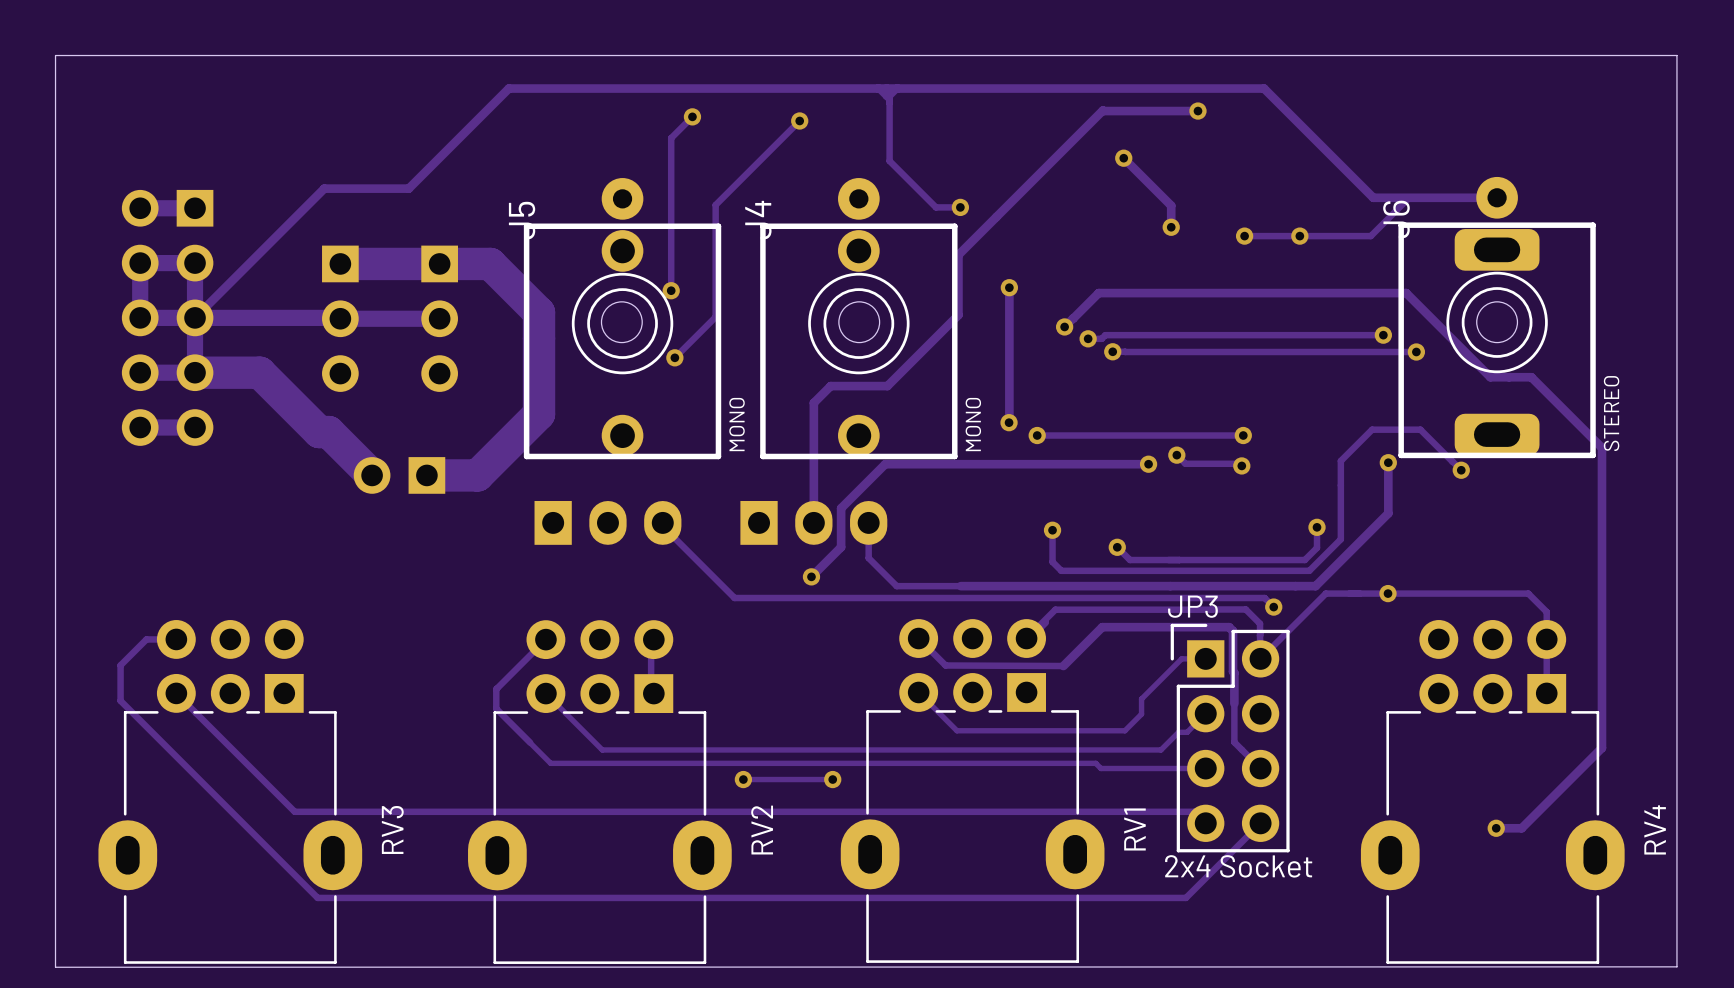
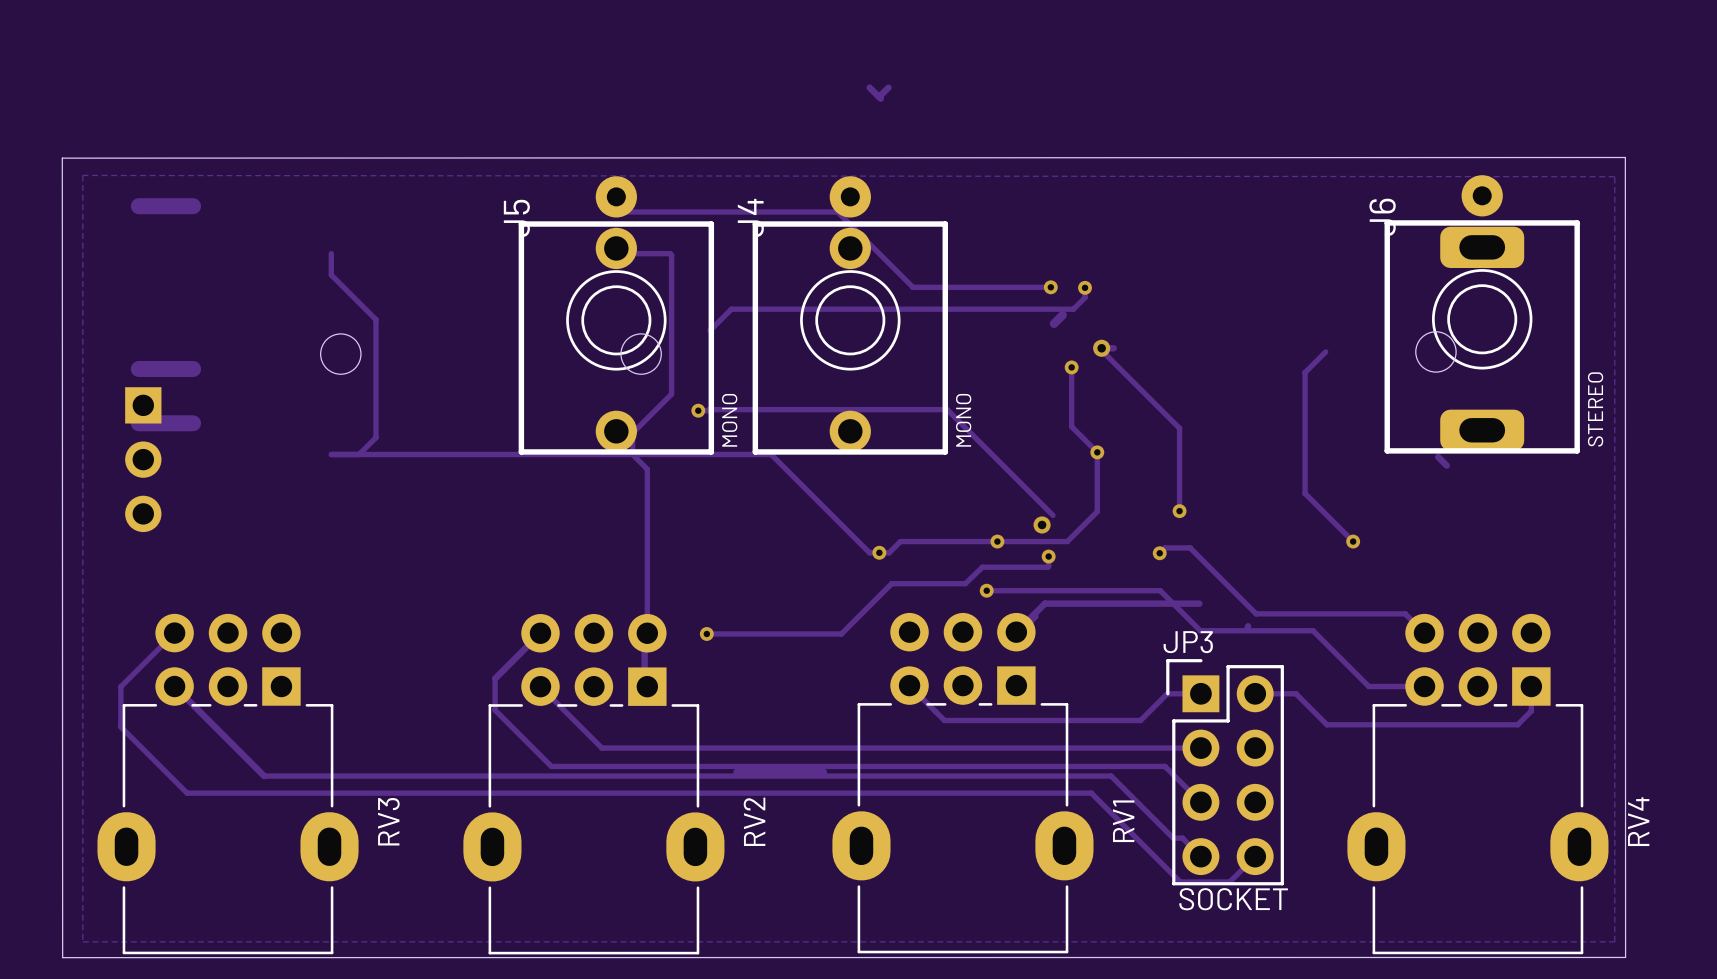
board edge: (55, 55) (1676, 55) (1676, 966) (55, 967) (55, 55) -> (1625, 157) (62, 158) (62, 957) (1625, 957) (1625, 157)
track: (886, 88) (889, 91) (889, 161) (936, 207) (960, 207) -> none
track: (1197, 111) (1102, 110) (958, 254) (958, 315) (887, 386) (830, 386) (813, 402) (813, 522) -> none
via: (1197, 111) -> none
track: (692, 116) (671, 138) (671, 290) -> none
via: (692, 116) -> none
track: (799, 120) (715, 205) (715, 317) (674, 357) -> none
via: (799, 120) -> none
track: (1123, 158) (1171, 205) (1171, 227) -> none
via: (1123, 158) -> none
zone outline: none -> (82, 175) (82, 941) (1614, 941) (1614, 176) (82, 175)
via: (960, 207) -> none
track: none -> (606, 211) (837, 211) (913, 287) (1050, 287)
via: (1171, 227) -> none
track: (1244, 236) (1370, 236) (1409, 197) (1497, 197) (1373, 197) (1264, 88) (508, 88) (408, 188) (324, 188) (195, 317) -> none
via: (1244, 236) -> none
via: (1299, 236) -> none
track: none -> (331, 253) (331, 275) (375, 319) (375, 437) (359, 454)
track: none -> (632, 253) (669, 253) (671, 255) (671, 394) (632, 433) (632, 454) (647, 469) (647, 633)
track: (340, 263) (490, 263) (539, 312) (539, 414) (477, 475) (426, 475) -> none
track: (1009, 287) (1009, 422) -> none
via: (1009, 287) -> none
via: (671, 290) -> none
via: none -> (1050, 287)
track: none -> (1085, 287) (1085, 297) (1073, 309) (731, 309) (710, 330)
via: none -> (1085, 287)
round board edge: [838, 301, 881, 344] -> none
part: (167, 317) -> none
part: (340, 318) -> none
track: (439, 318) (339, 317) (140, 317) (140, 263) (195, 263) (195, 372) (259, 372) (319, 432) (328, 432) (372, 475) -> none
part: (439, 318) -> none
track: (1073, 318) (1098, 293) (1406, 293) (1490, 377) (1531, 377) (1601, 447) (1601, 748) (1521, 828) (1496, 828) -> none
round board edge position: (621, 322) -> (641, 354)
round board edge position: (1497, 322) -> (1435, 351)
via: (1064, 326) -> none
track: (1383, 335) (1105, 335) (1101, 338) (1088, 338) -> none
via: (1383, 335) -> none
round board edge: none -> [320, 333, 362, 375]
via: (1088, 338) -> none
track: none -> (1096, 345) (1179, 428) (1179, 511)
track: (1125, 351) (1416, 351) -> none
via: (1416, 351) -> none
track: none -> (1325, 351) (1305, 372) (1305, 493) (1353, 541)
via: (674, 357) -> none
track: none -> (1071, 367) (1071, 426) (1097, 452) (1097, 511) (1067, 541) (900, 541) (889, 552) (869, 552) (771, 454) (331, 454)
via: none -> (1071, 367)
track: none -> (698, 410) (947, 409) (1052, 515)
via: none -> (698, 410)
via: (1009, 422) -> none
track: (1037, 435) (1243, 435) -> none
via: (1037, 435) -> none
via: (1243, 435) -> none
track: (1176, 455) (1185, 463) (1239, 463) (1241, 465) -> none
via: (1176, 455) -> none
via: none -> (1097, 452)
track: (1452, 461) (1420, 429) (1372, 429) (1340, 460) (1340, 539) (1309, 570) (1061, 570) (1052, 561) (1052, 530) -> none
track: (1388, 462) (1388, 513) (1315, 586) (896, 586) (868, 558) (868, 522) -> none
via: (1388, 462) -> none
part: none -> (143, 459)
track: (1148, 464) (885, 464) (841, 508) (841, 547) (811, 576) -> none
via: (1148, 464) -> none
via: (1241, 465) -> none
via: (1461, 470) -> none
part: (399, 475) -> none
via: none -> (1179, 511)
part: (607, 522) -> none
track: (662, 522) (662, 526) (734, 598) (1264, 598) (1273, 607) -> none
part: (813, 522) -> none
track: (1317, 527) (1317, 547) (1304, 560) (1130, 560) (1117, 547) -> none
via: (1317, 527) -> none
via: none -> (997, 541)
via: (1117, 547) -> none
via: none -> (1353, 541)
via: none -> (879, 552)
track: none -> (1159, 553) (1165, 547) (1190, 547) (1256, 613) (1405, 613) (1424, 633)
via: none -> (1159, 553)
track: none -> (1048, 556) (1047, 567) (982, 567) (965, 583) (891, 583) (841, 633) (706, 633)
via: none -> (1048, 556)
via: (811, 576) -> none
via: (1388, 593) -> none
track: none -> (986, 590) (1160, 590) (1200, 630) (1313, 630) (1368, 686) (1424, 686)
via: none -> (986, 590)
via: (1273, 607) -> none
track: (1211, 609) (1245, 609) (1260, 623) (1260, 658) (1325, 593) (1528, 593) (1546, 611) (1546, 693) -> (1255, 693) (1296, 693) (1326, 724) (1517, 724) (1531, 711) (1531, 686)
track: (918, 638) (945, 665) (1063, 666) (1102, 627) (1229, 627) (1233, 631) (1234, 742) (1260, 768) -> none
track: (176, 639) (146, 639) (120, 665) (120, 700) (317, 897) (1185, 897) (1260, 823) -> (174, 633) (120, 686) (120, 726) (187, 793) (1091, 793) (1180, 882) (1229, 882) (1255, 856)
via: none -> (706, 633)
track: (1205, 658) (1181, 658) (1141, 699) (1141, 714) (1124, 730) (956, 730) (954, 727) -> (1200, 693) (1167, 693) (1140, 720) (944, 720)
track: (500, 685) (496, 689) (496, 708) (530, 742) -> (495, 678) (495, 710) (551, 766) (1165, 766) (1200, 802)
track: (1205, 713) (1187, 732) (1178, 732) (1160, 749) (602, 749) -> (1200, 748) (601, 748) (596, 742)
JP3 position: (1230, 738) -> (1225, 772)
track: (530, 742) (550, 763) (1095, 763) (1100, 768) (1205, 768) -> none
via: (743, 779) -> none
via: (832, 779) -> none
track: (266, 783) (294, 811) (1194, 811) (1205, 823) -> (264, 776) (1111, 776) (1173, 838) (1182, 838) (1200, 856)
via: (1496, 828) -> none
JP3 value: 2x4 Socket (1238, 866) -> SOCKET (1233, 899)

